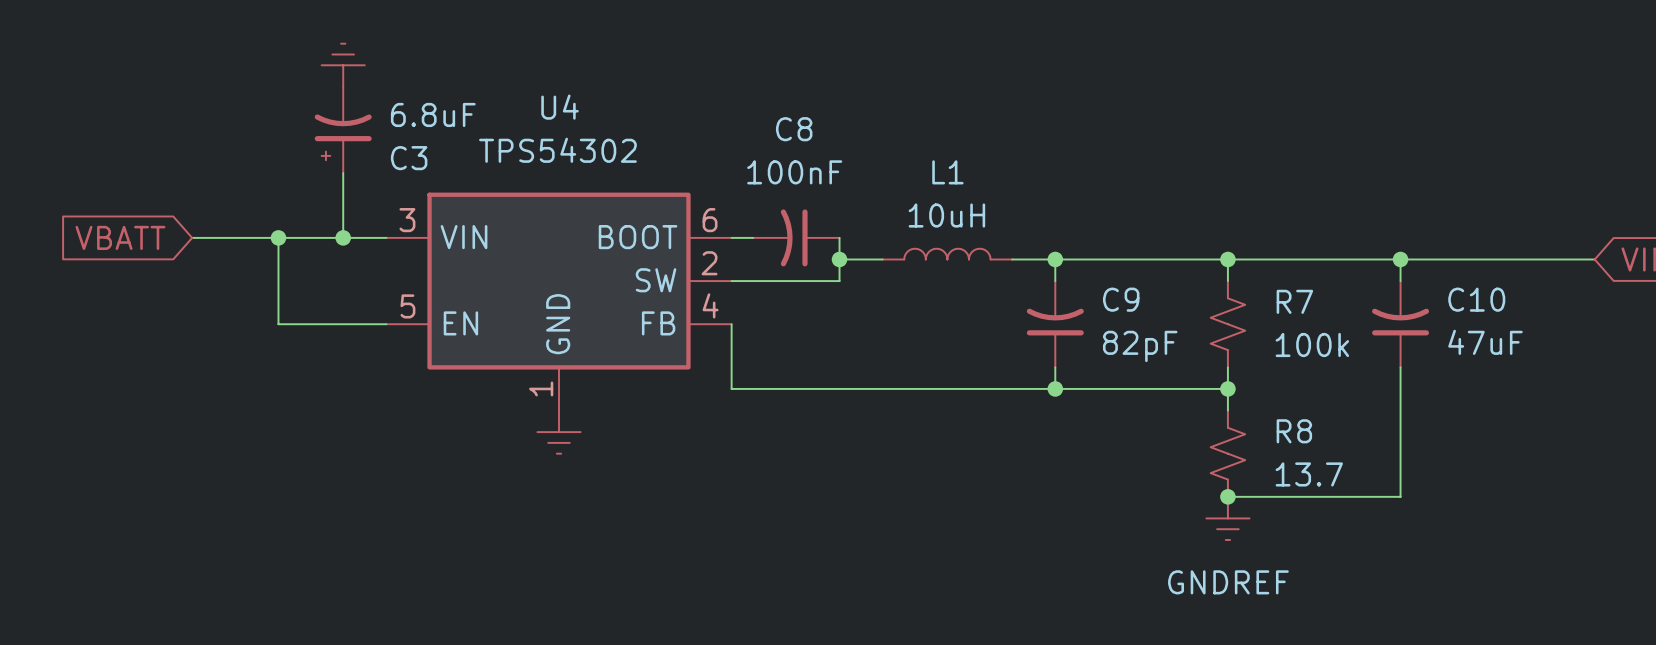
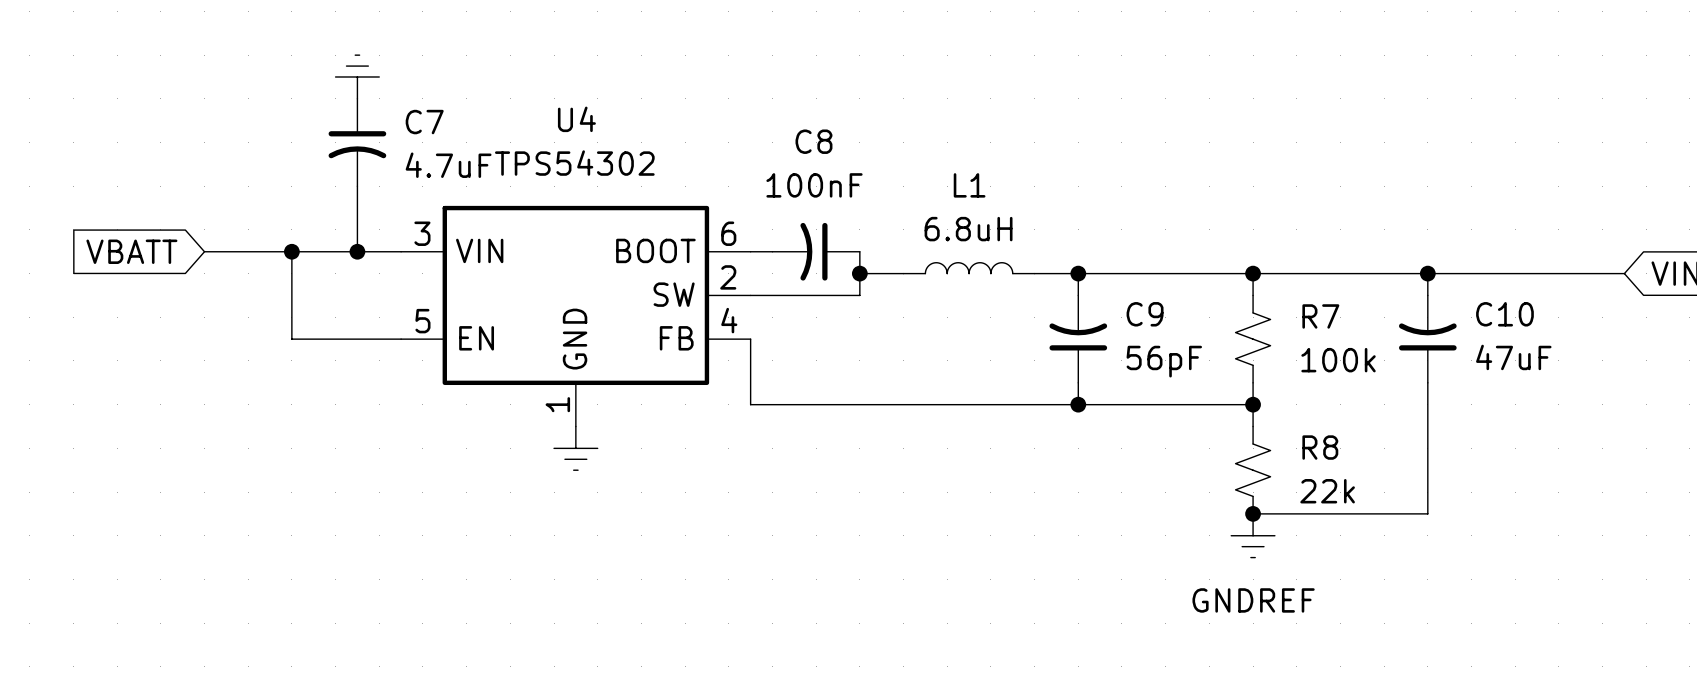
C3: 6.8uF (343, 130) -> none
C7: none -> 4.7uF (357, 142)
L1 value: 10uH (946, 215) -> 6.8uH (968, 229)
C9 value: 82pF (1140, 346) -> 56pF (1164, 361)
R8 value: 13.7 (1309, 474) -> 22k (1327, 491)

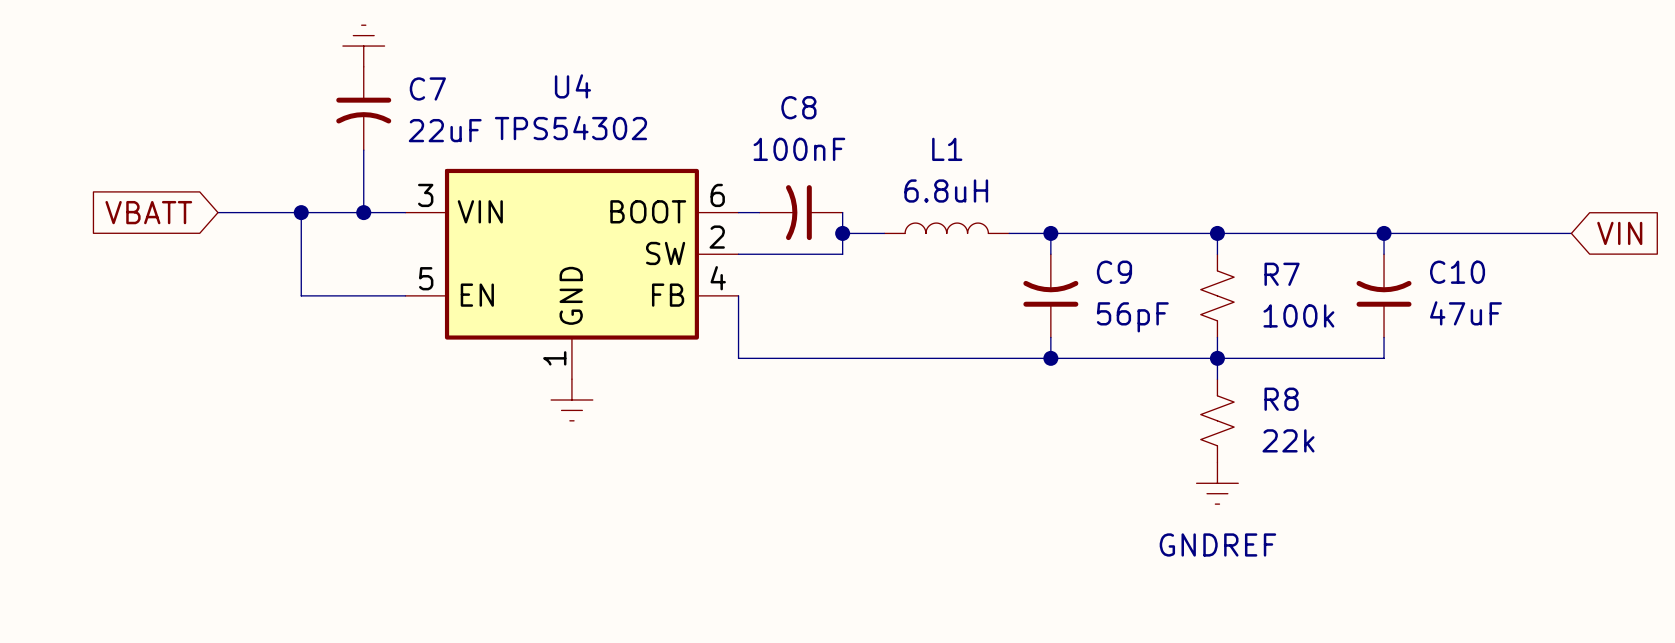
C7 value: 4.7uF (448, 165) -> 22uF (445, 130)
wire: (1427, 404) (1427, 513) (1253, 513) -> (1384, 358) (1217, 358)
junction: (1253, 513) -> none

